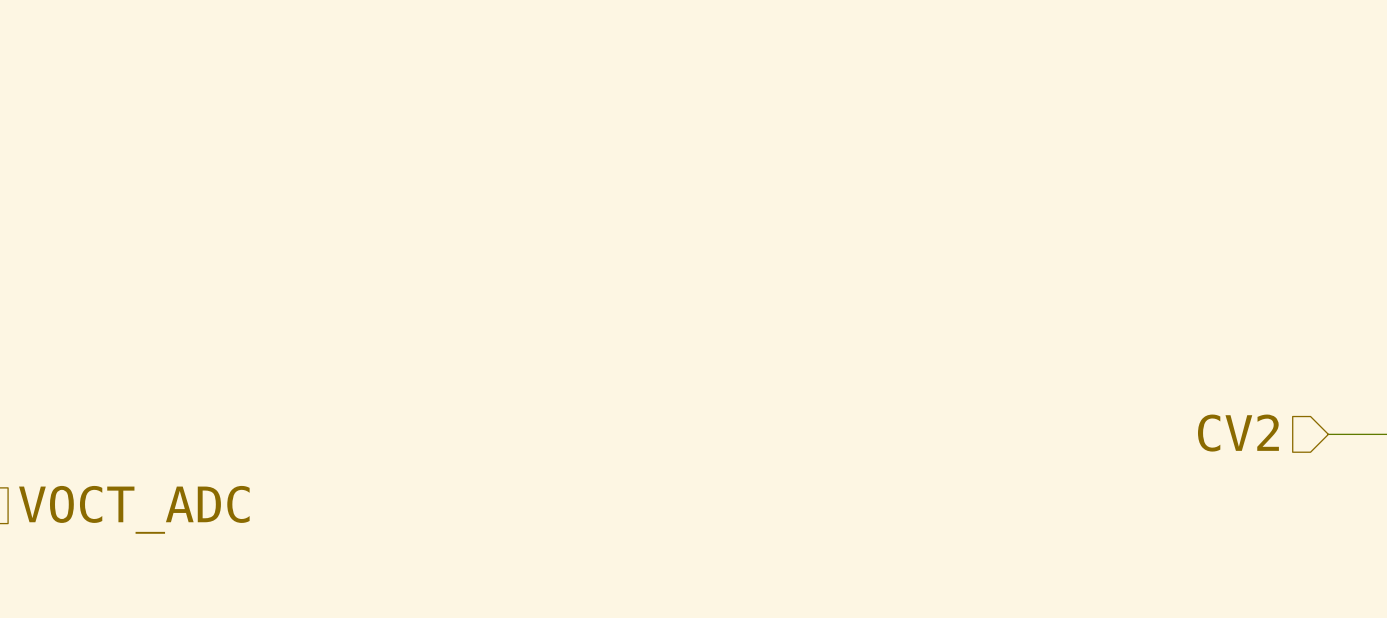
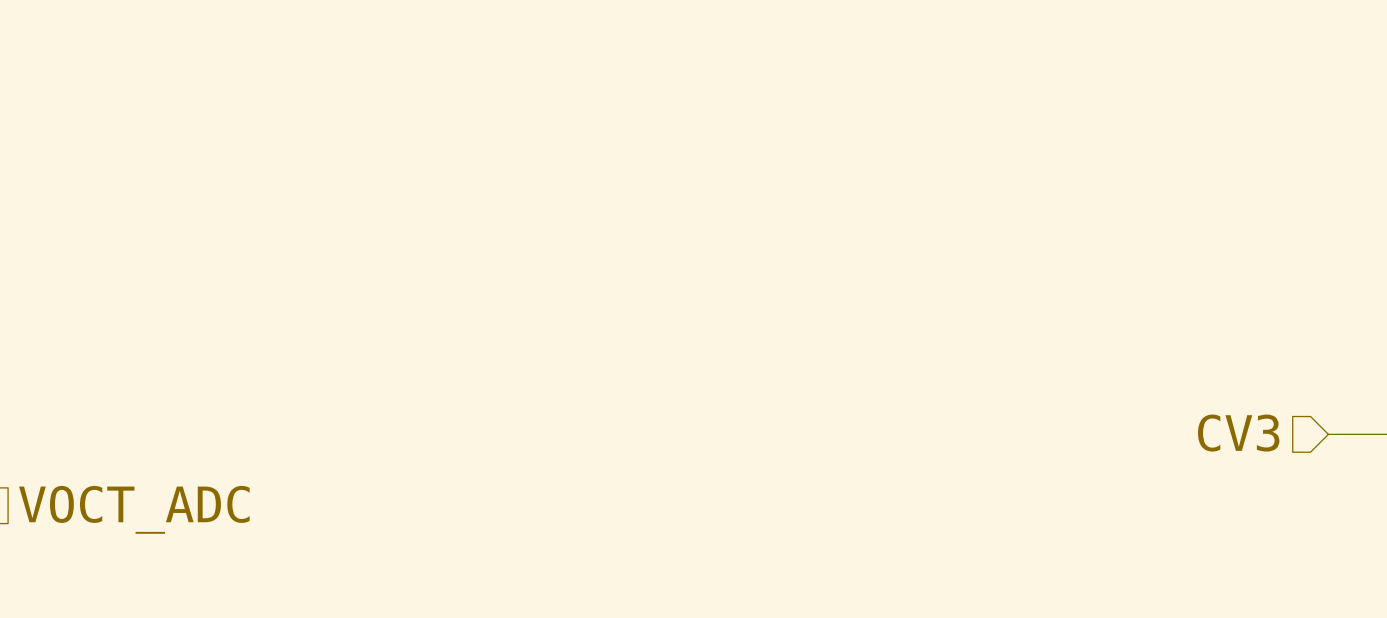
hierarchical label: CV2 (1238, 433) -> CV3 (1238, 433)

